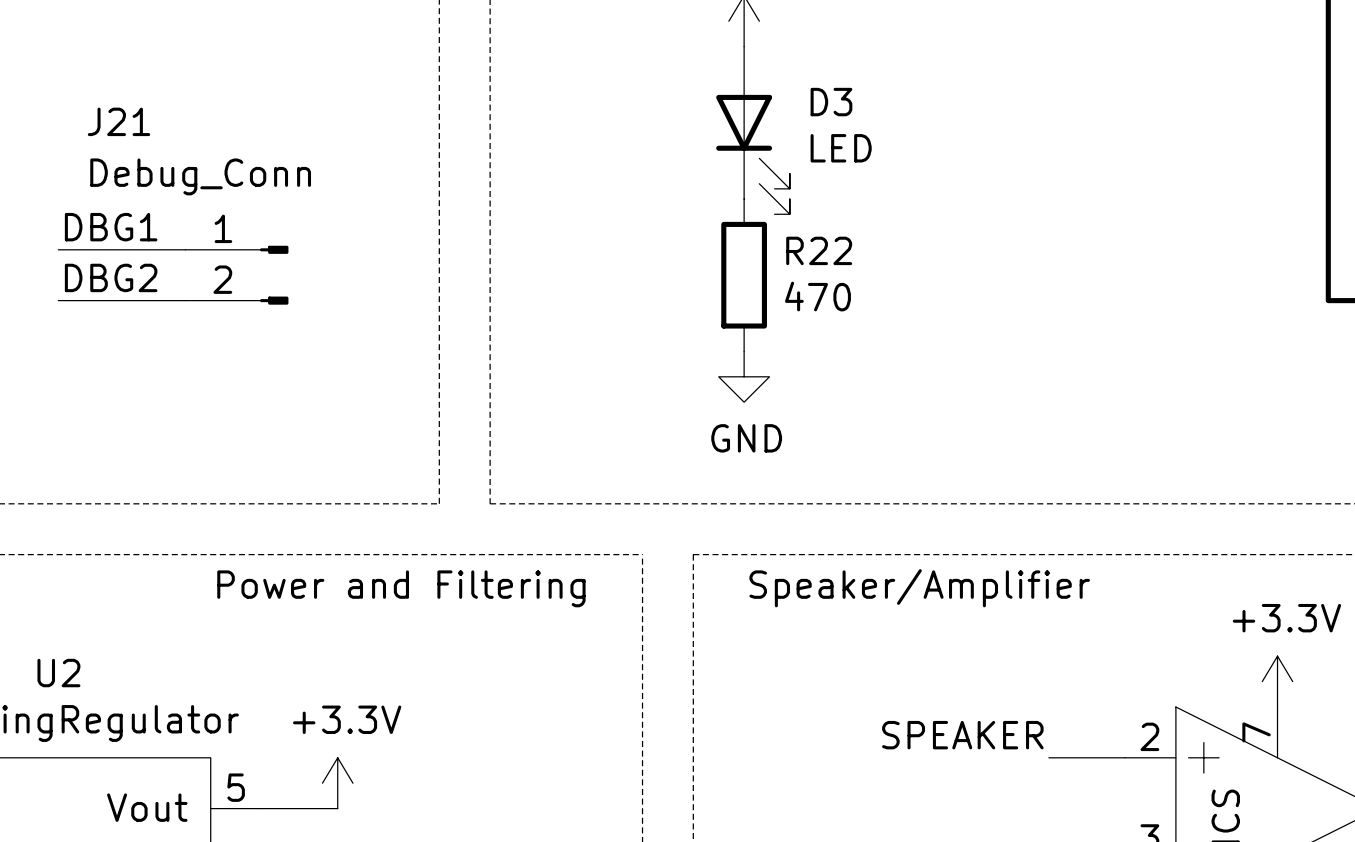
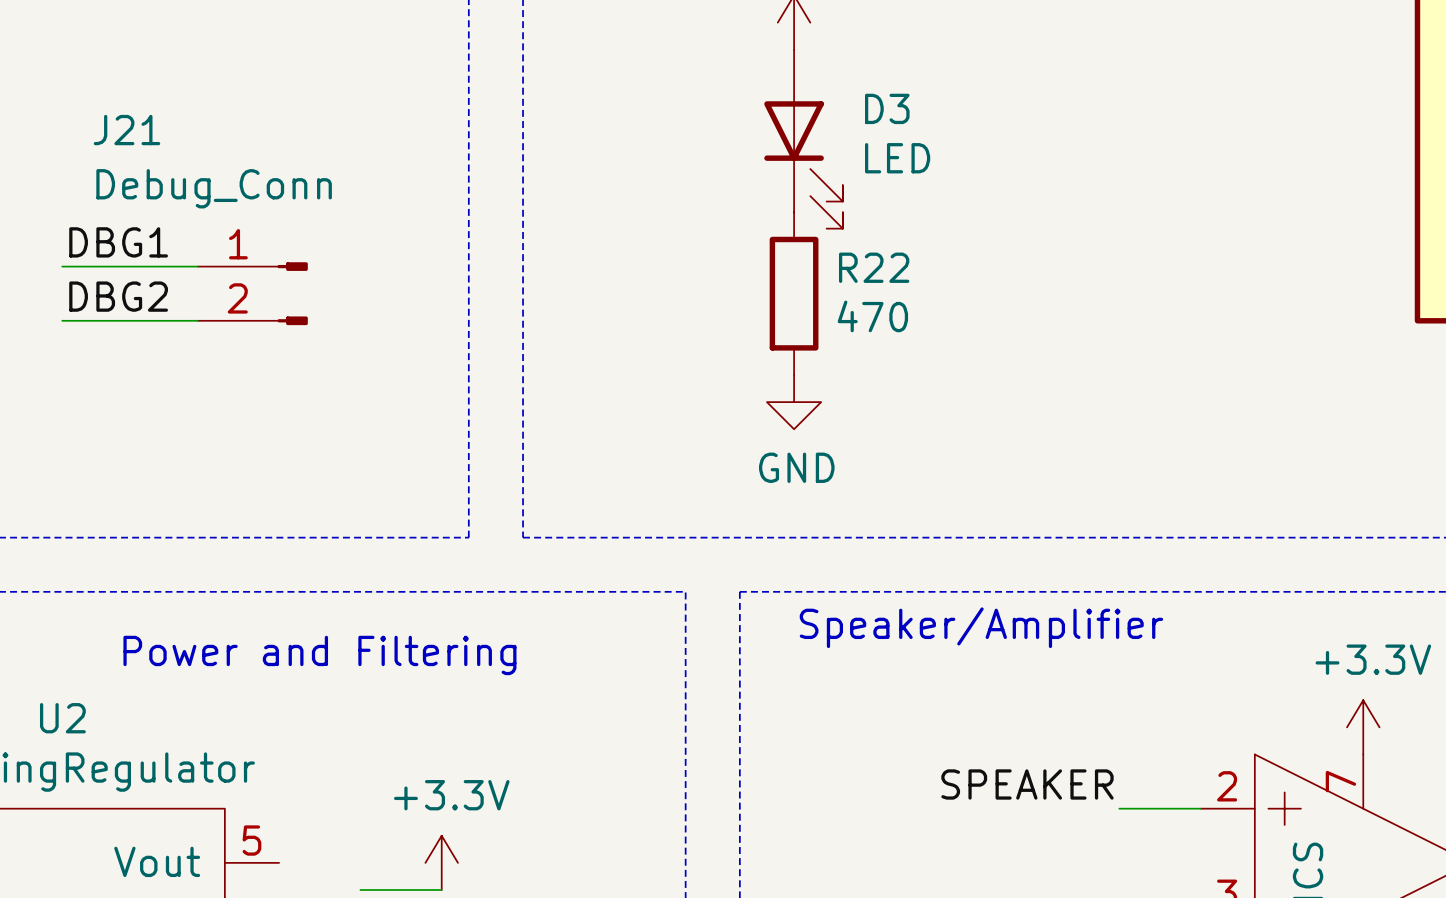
text position: Power and Filtering (401, 588) -> Power and Filtering (319, 655)
power symbol position: +3.3V (337, 783) -> +3.3V (441, 862)
wire: (261, 808) (337, 808) -> (360, 889) (441, 889)

